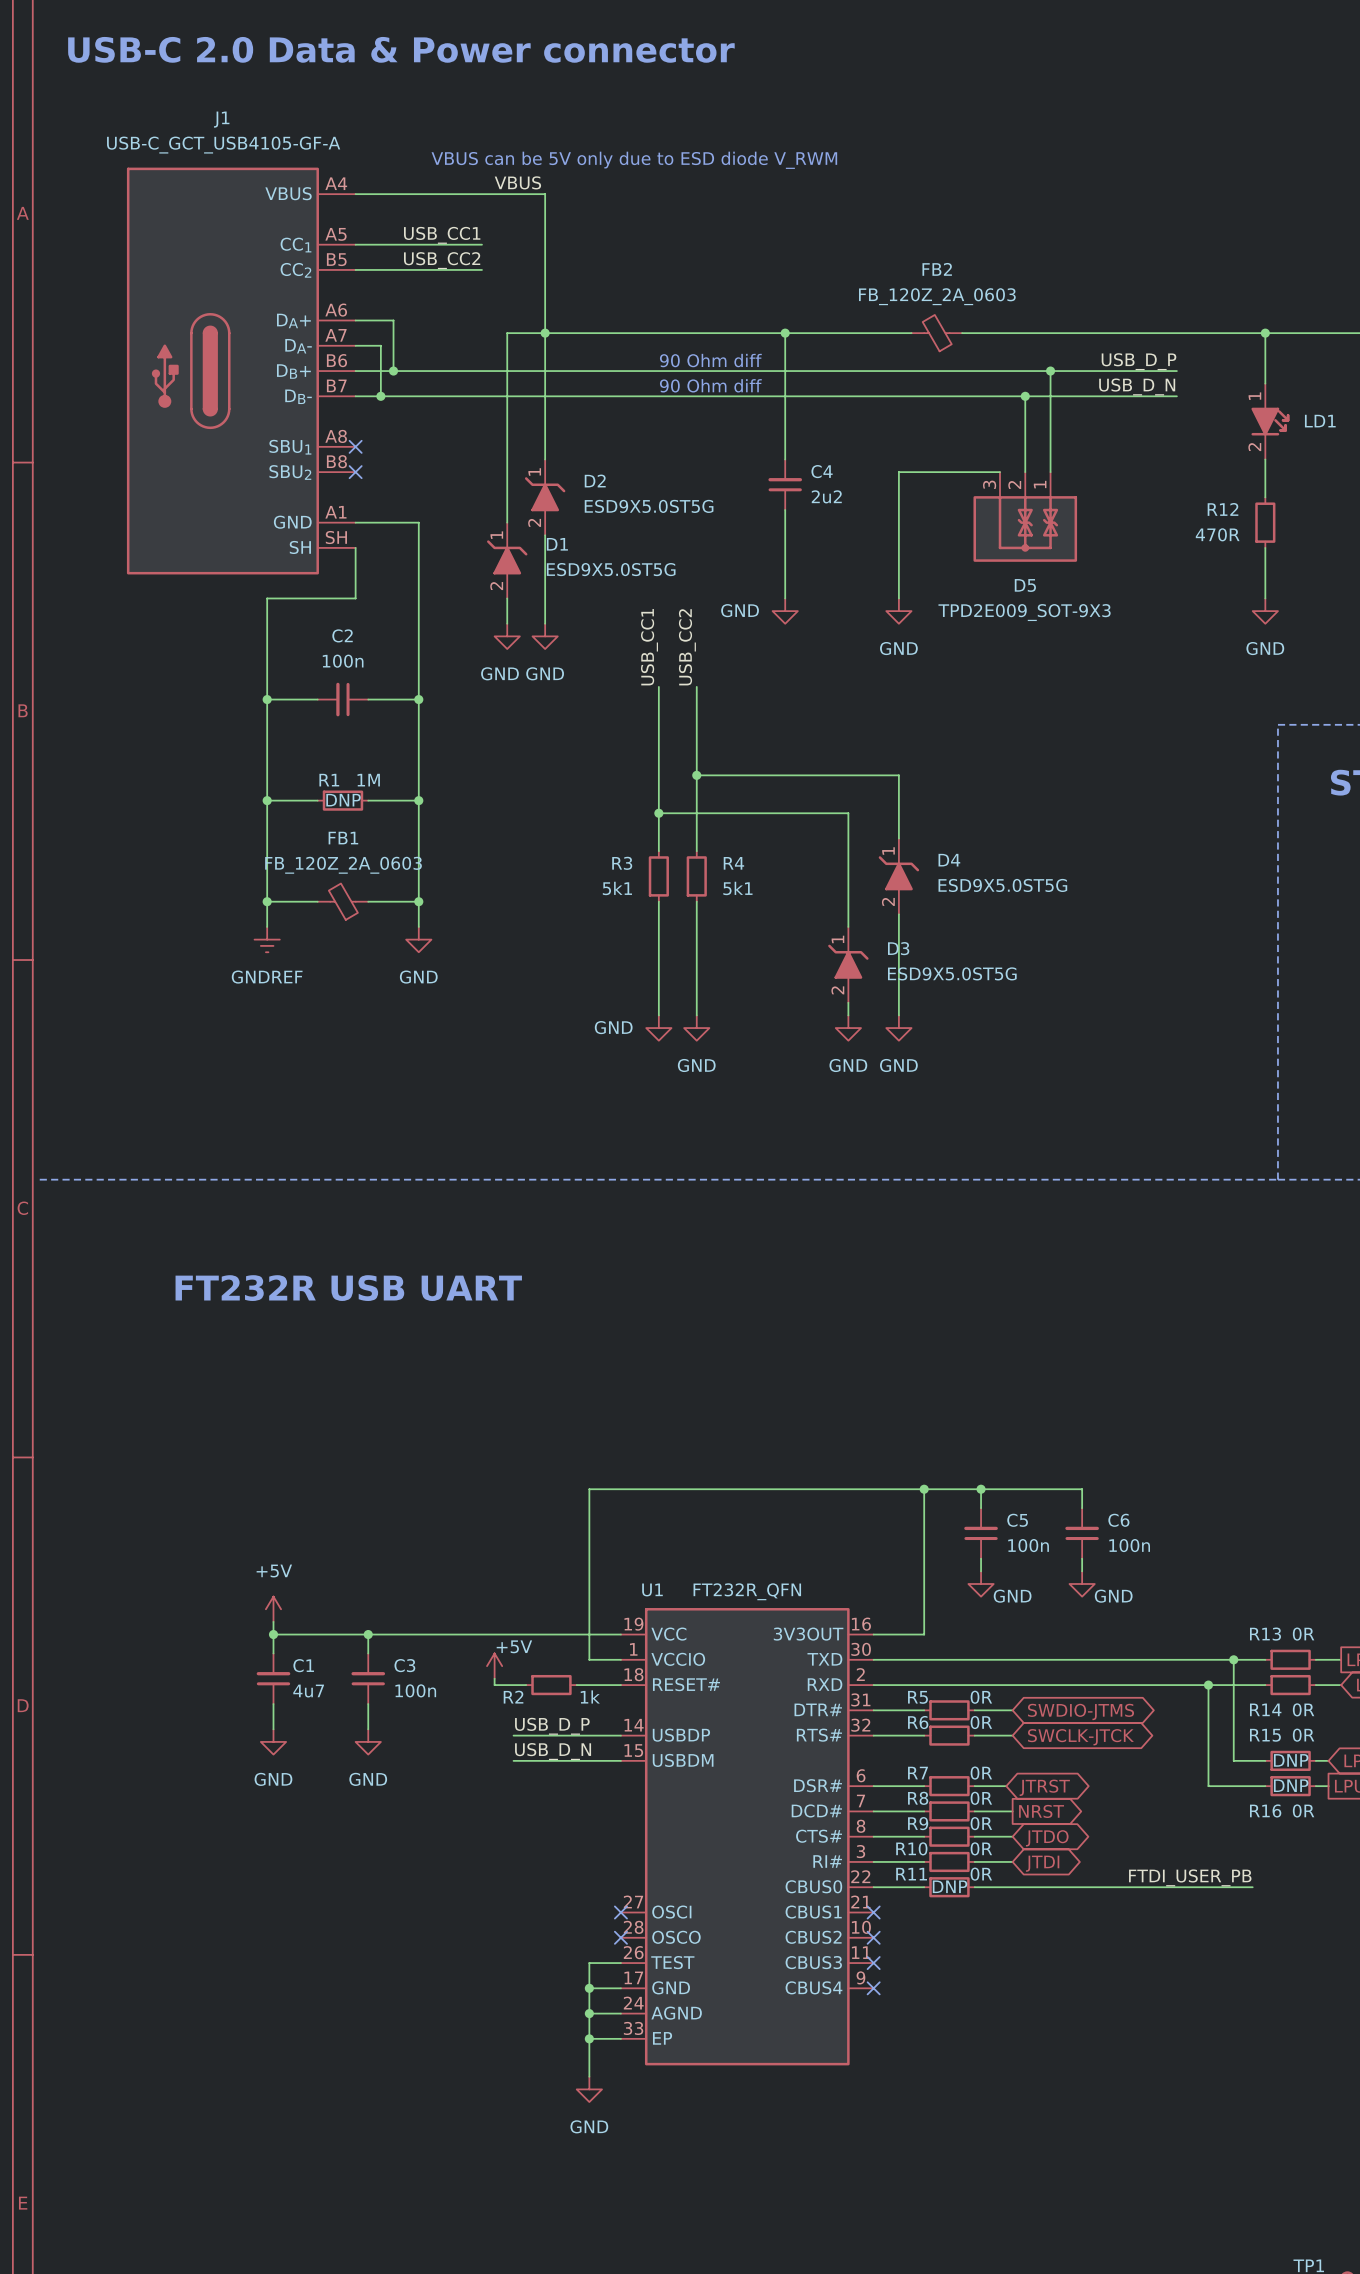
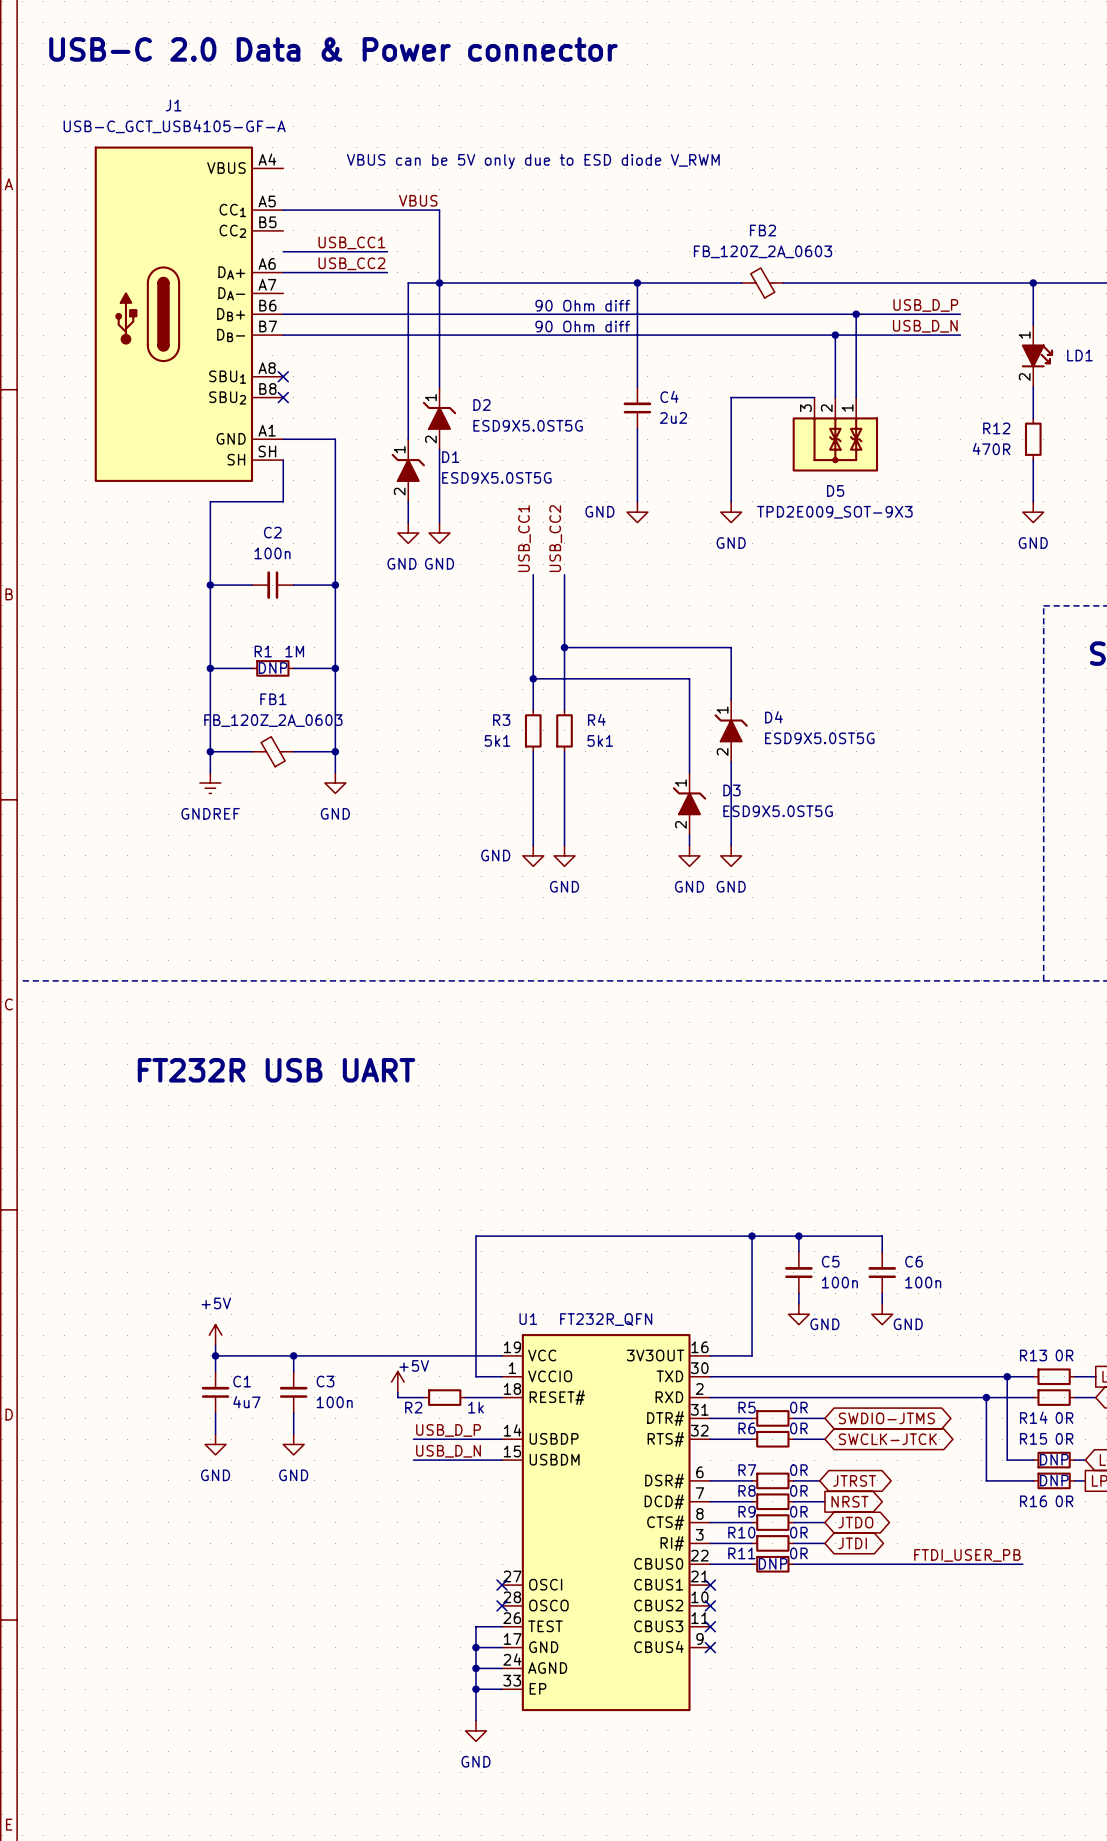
text position: VBUS can be 5V only due to ESD diode V_RWM (634, 160) -> VBUS can be 5V only due to ESD diode V_RWM (533, 161)
label position: VBUS (517, 182) -> VBUS (418, 200)
wire: (355, 194) (545, 194) (545, 244) -> (387, 210) (439, 210)
label position: USB_CC1 (442, 235) -> USB_CC1 (351, 242)
label position: USB_CC2 (442, 260) -> USB_CC2 (351, 263)
wire: (355, 269) (481, 269) -> (283, 251) (387, 251)
wire: (393, 320) (393, 371) -> (314, 272) (387, 272)
wire: (355, 345) (380, 345) (380, 396) -> none
junction: (393, 371) -> none
junction: (380, 396) -> none

